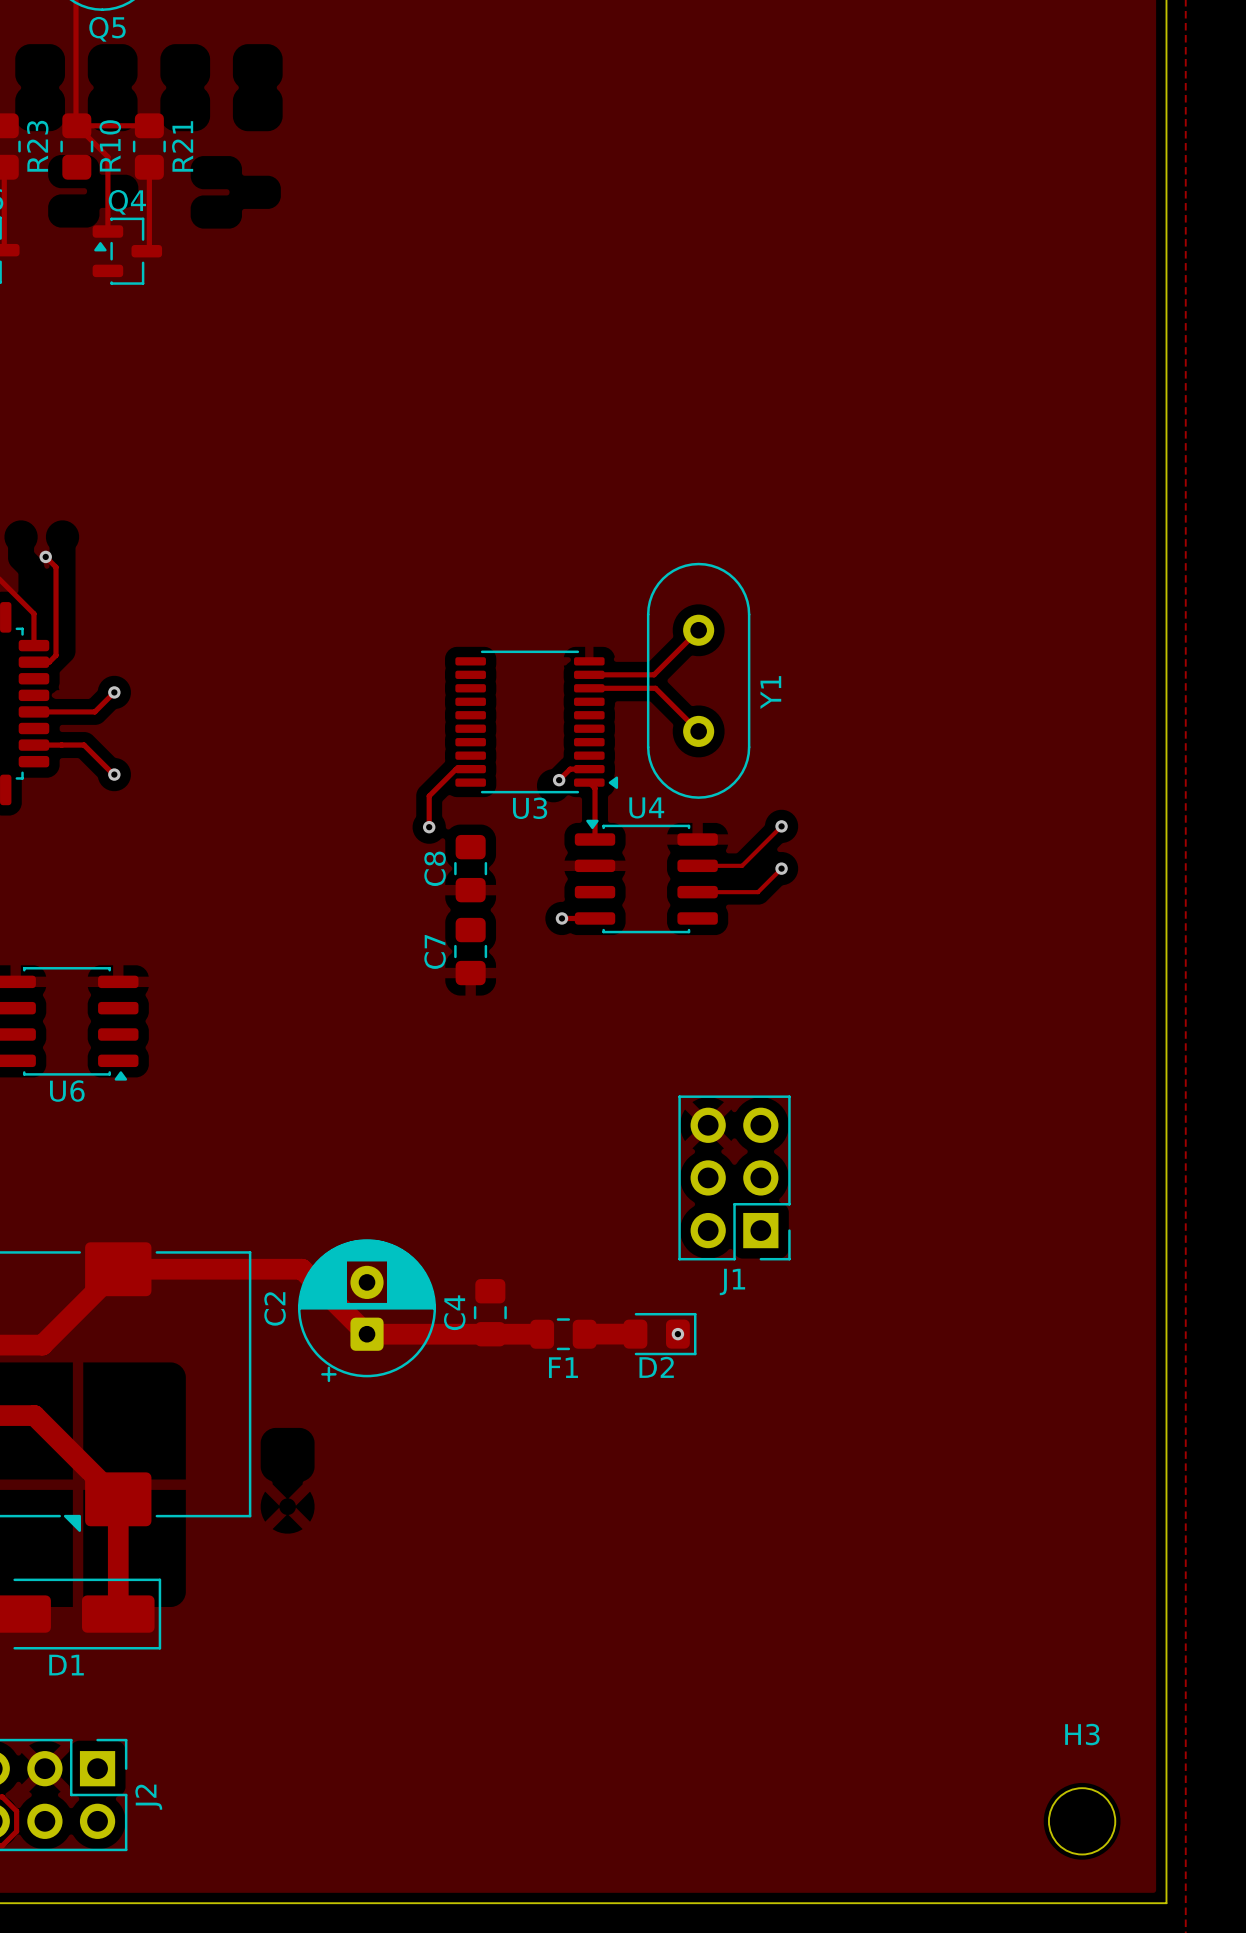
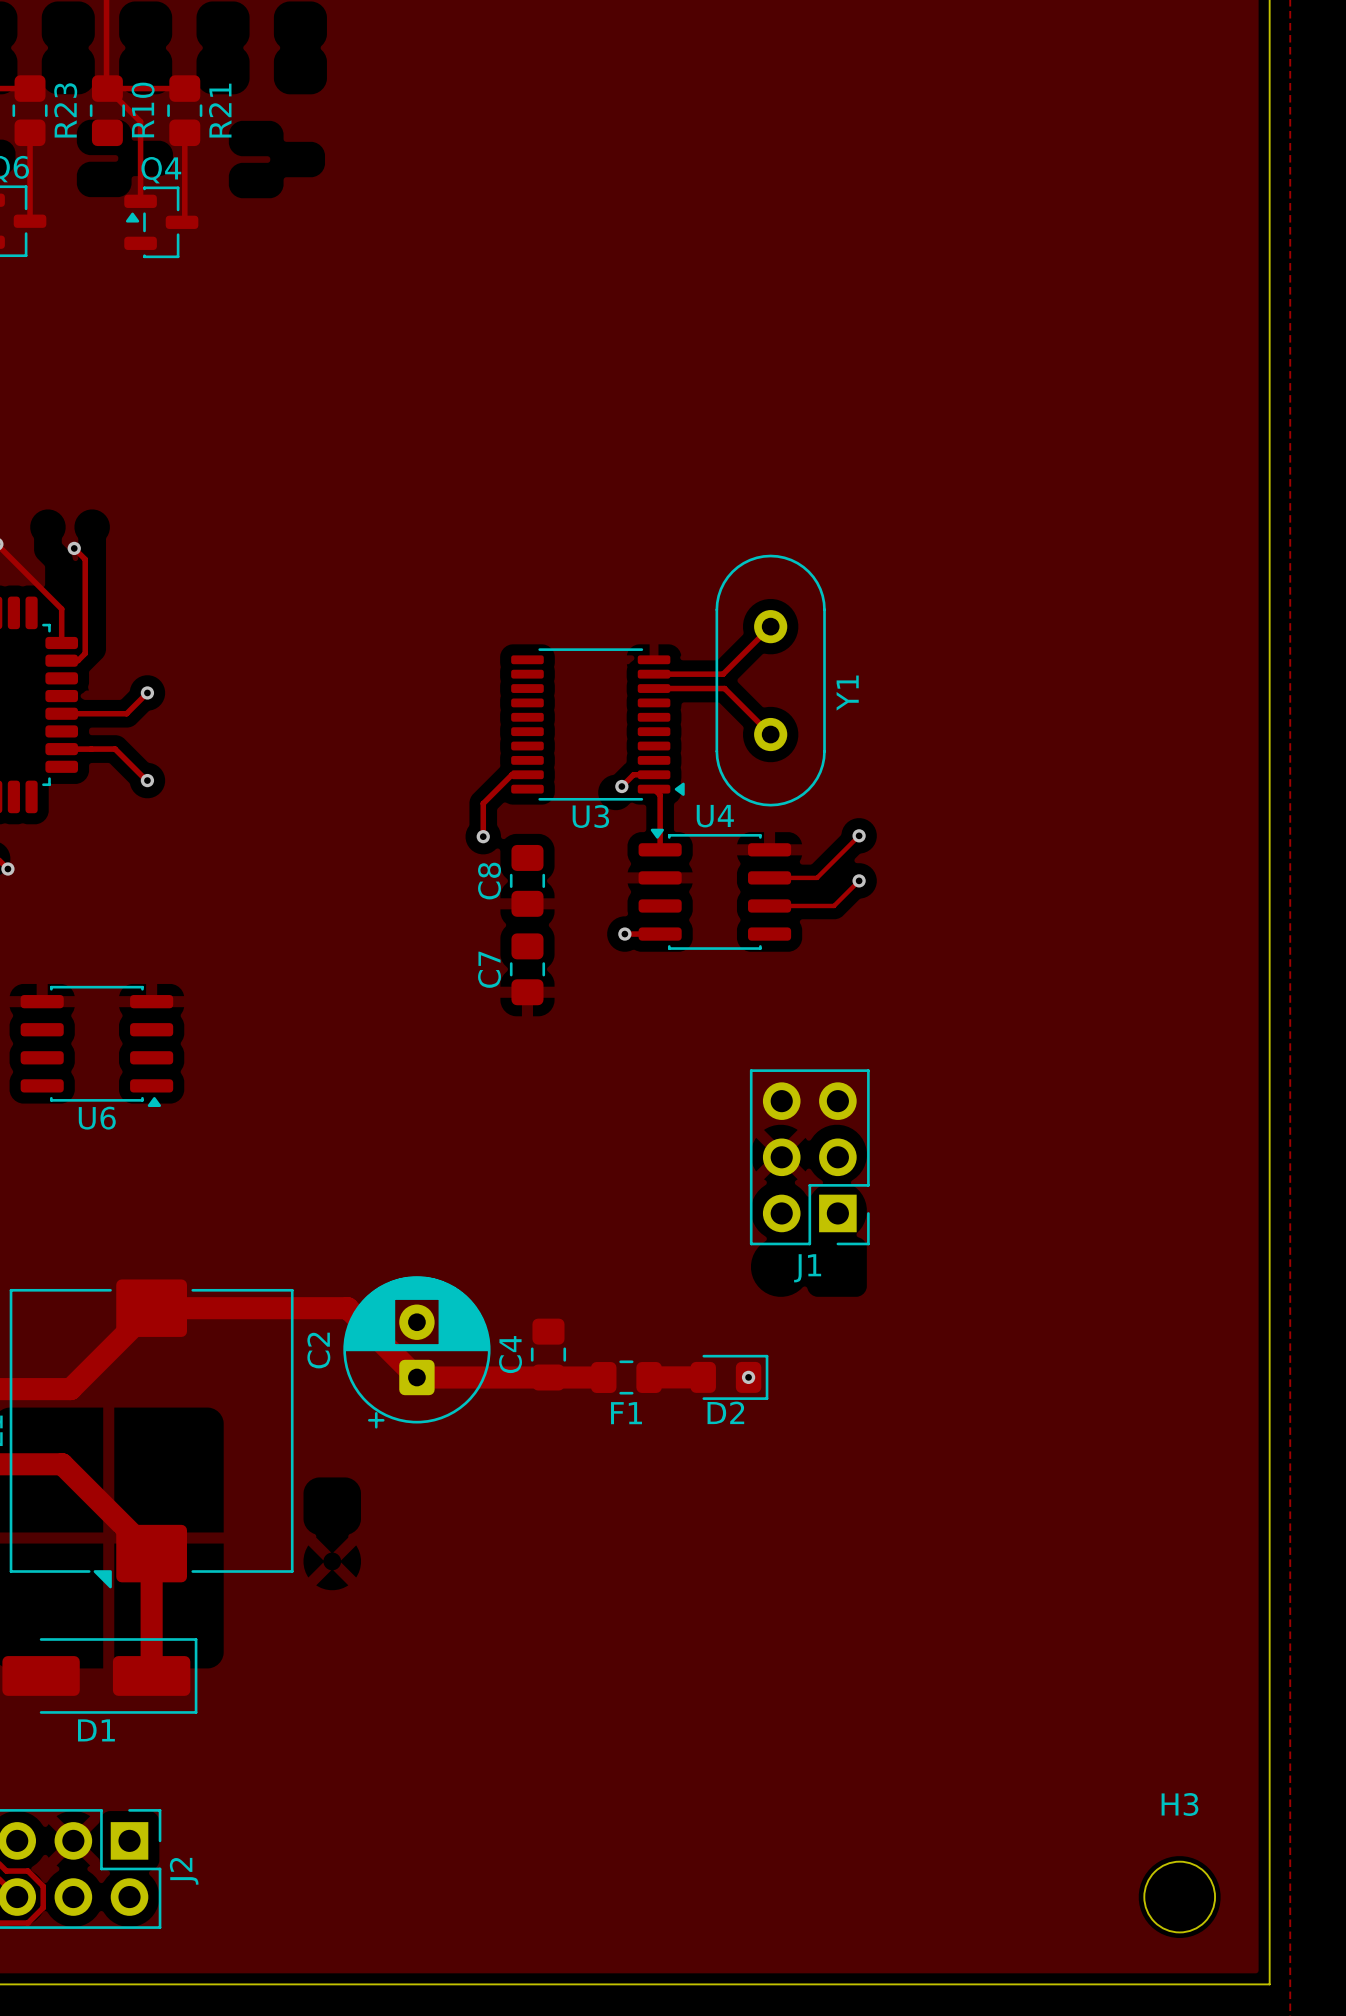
J1 position: (734, 1177) -> (809, 1157)

